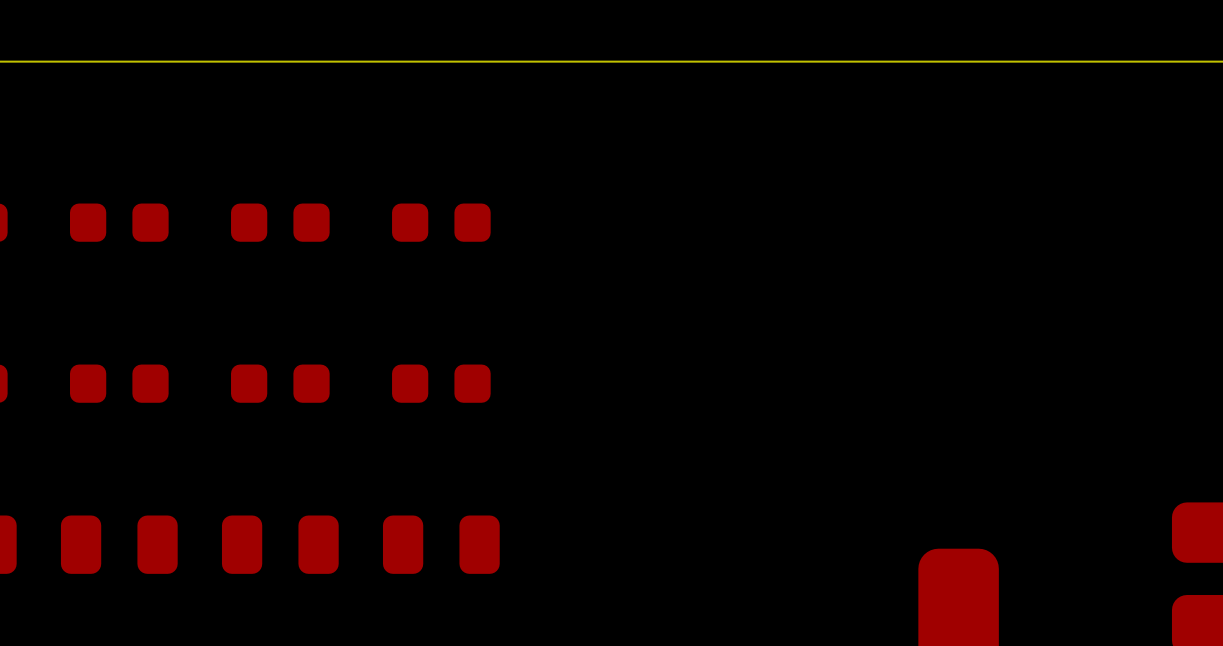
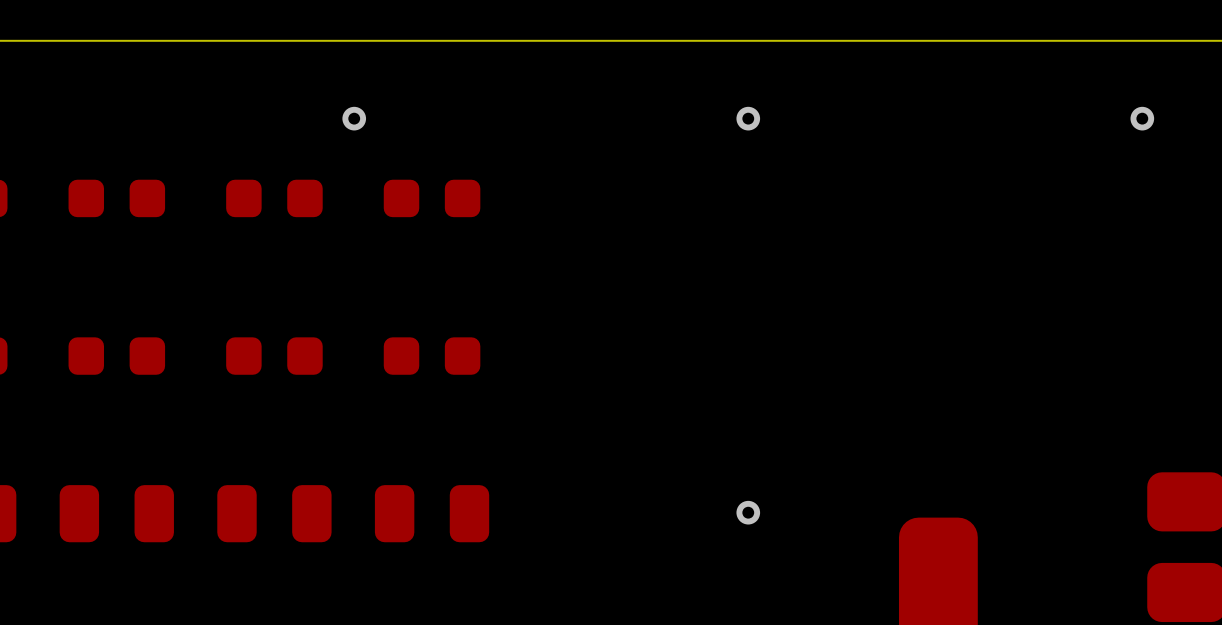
via: none -> (354, 118)
via: none -> (748, 118)
via: none -> (1142, 118)
via: none -> (748, 512)

